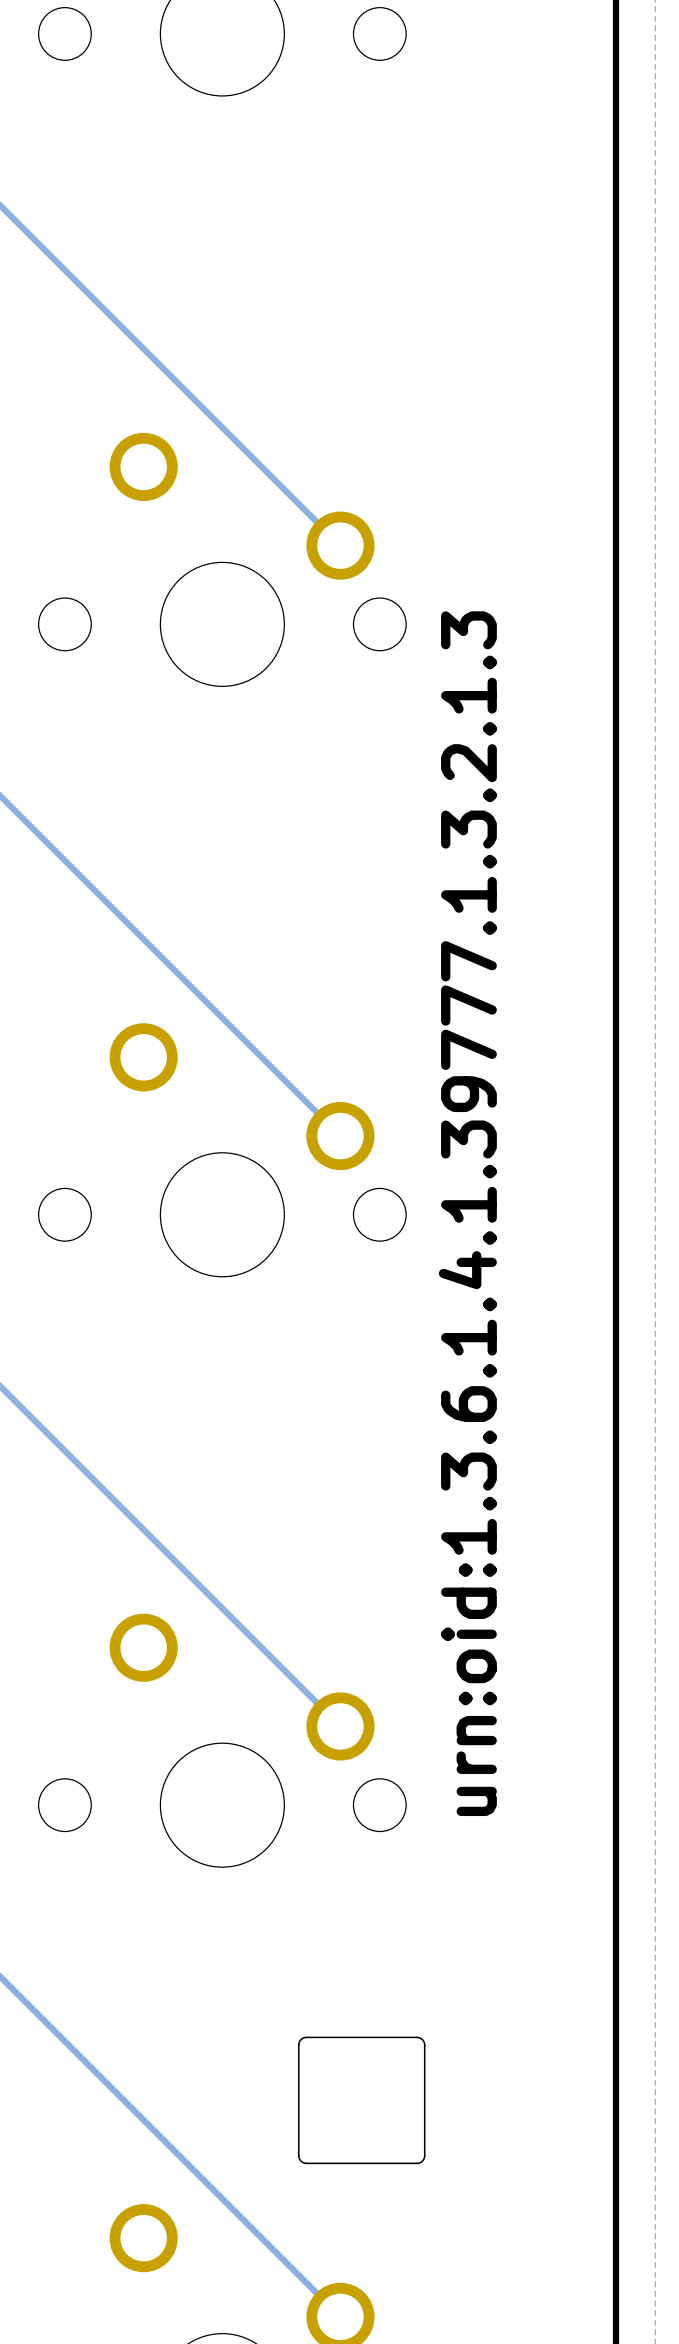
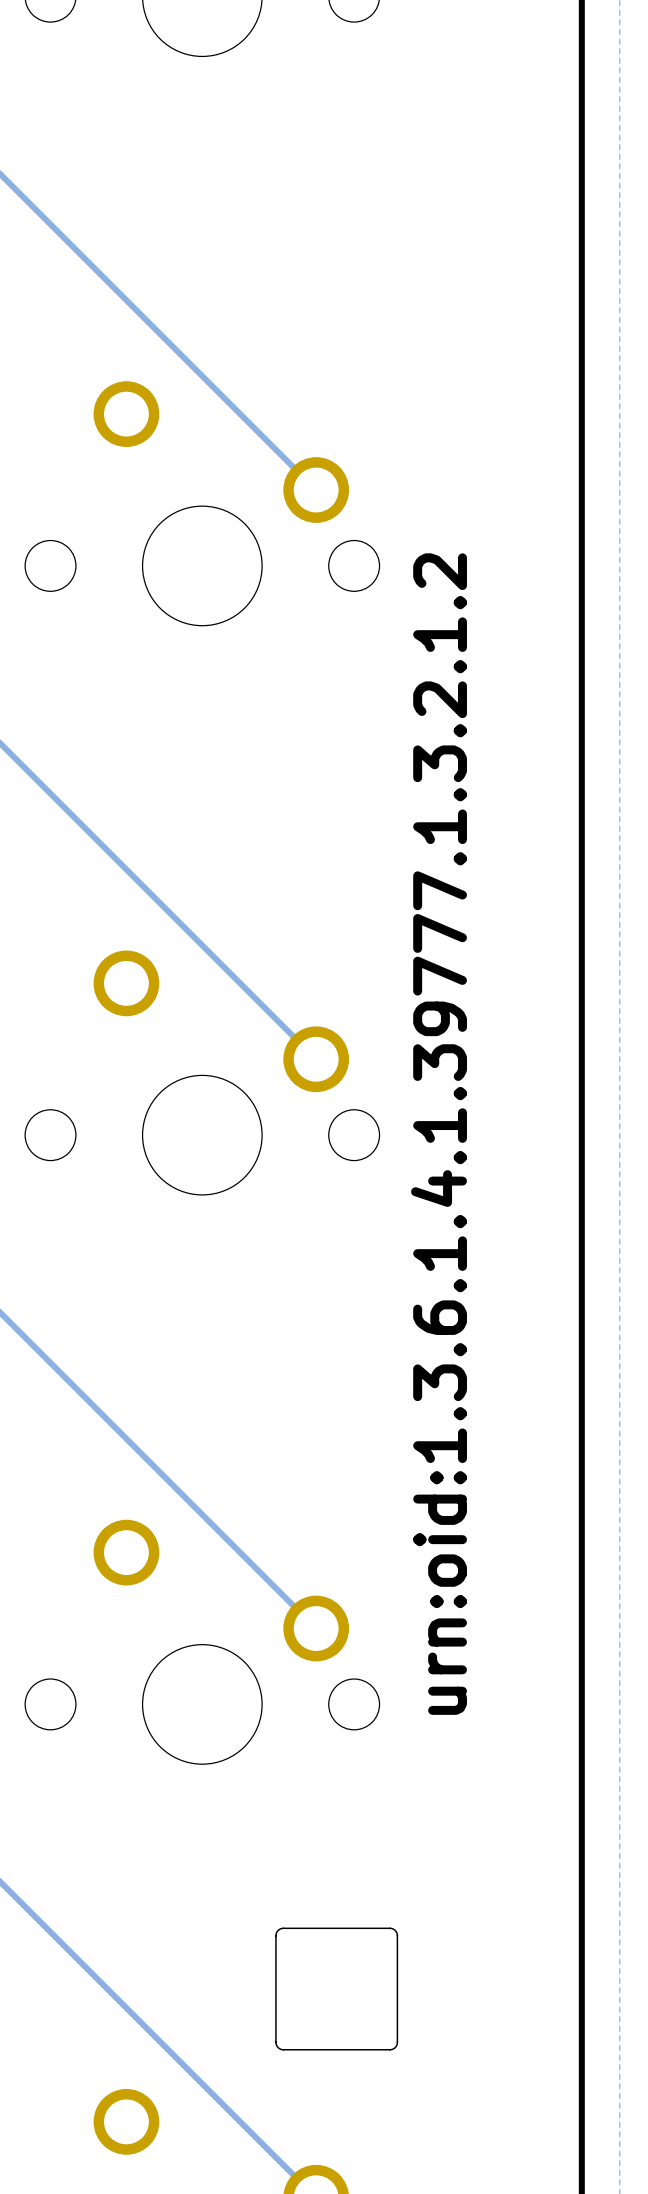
text: urn:oid:1.3.6.1.4.1.39777.1.3.2.1.3 (467, 1213) -> urn:oid:1.3.6.1.4.1.39777.1.3.2.1.2 (439, 1134)

